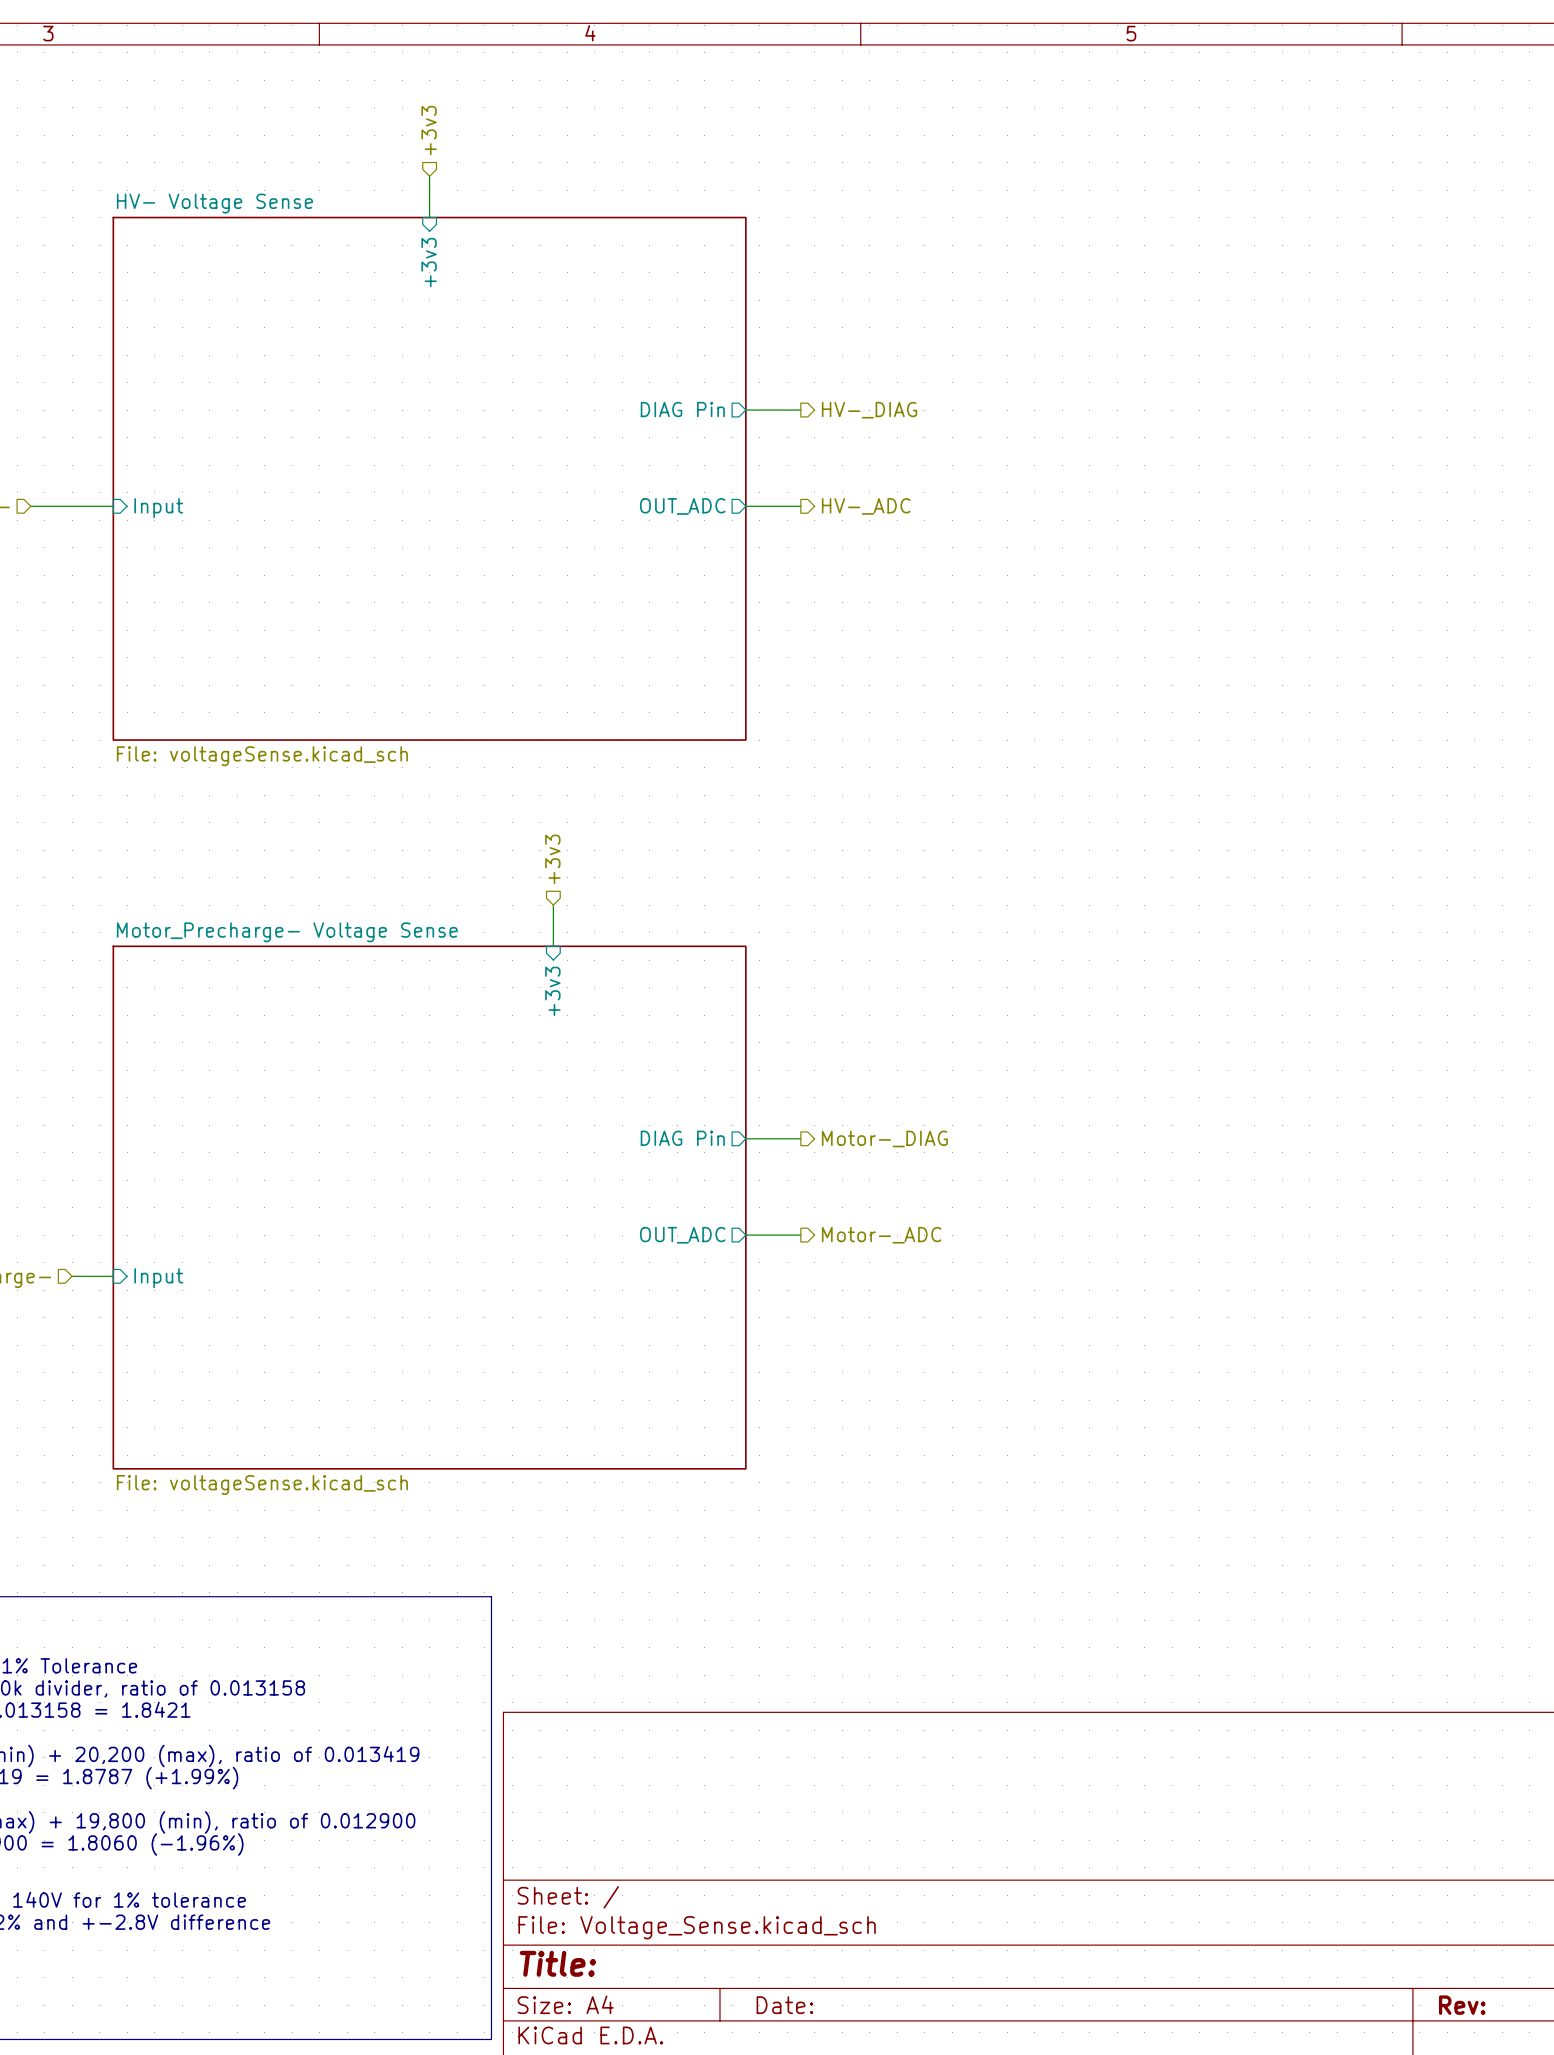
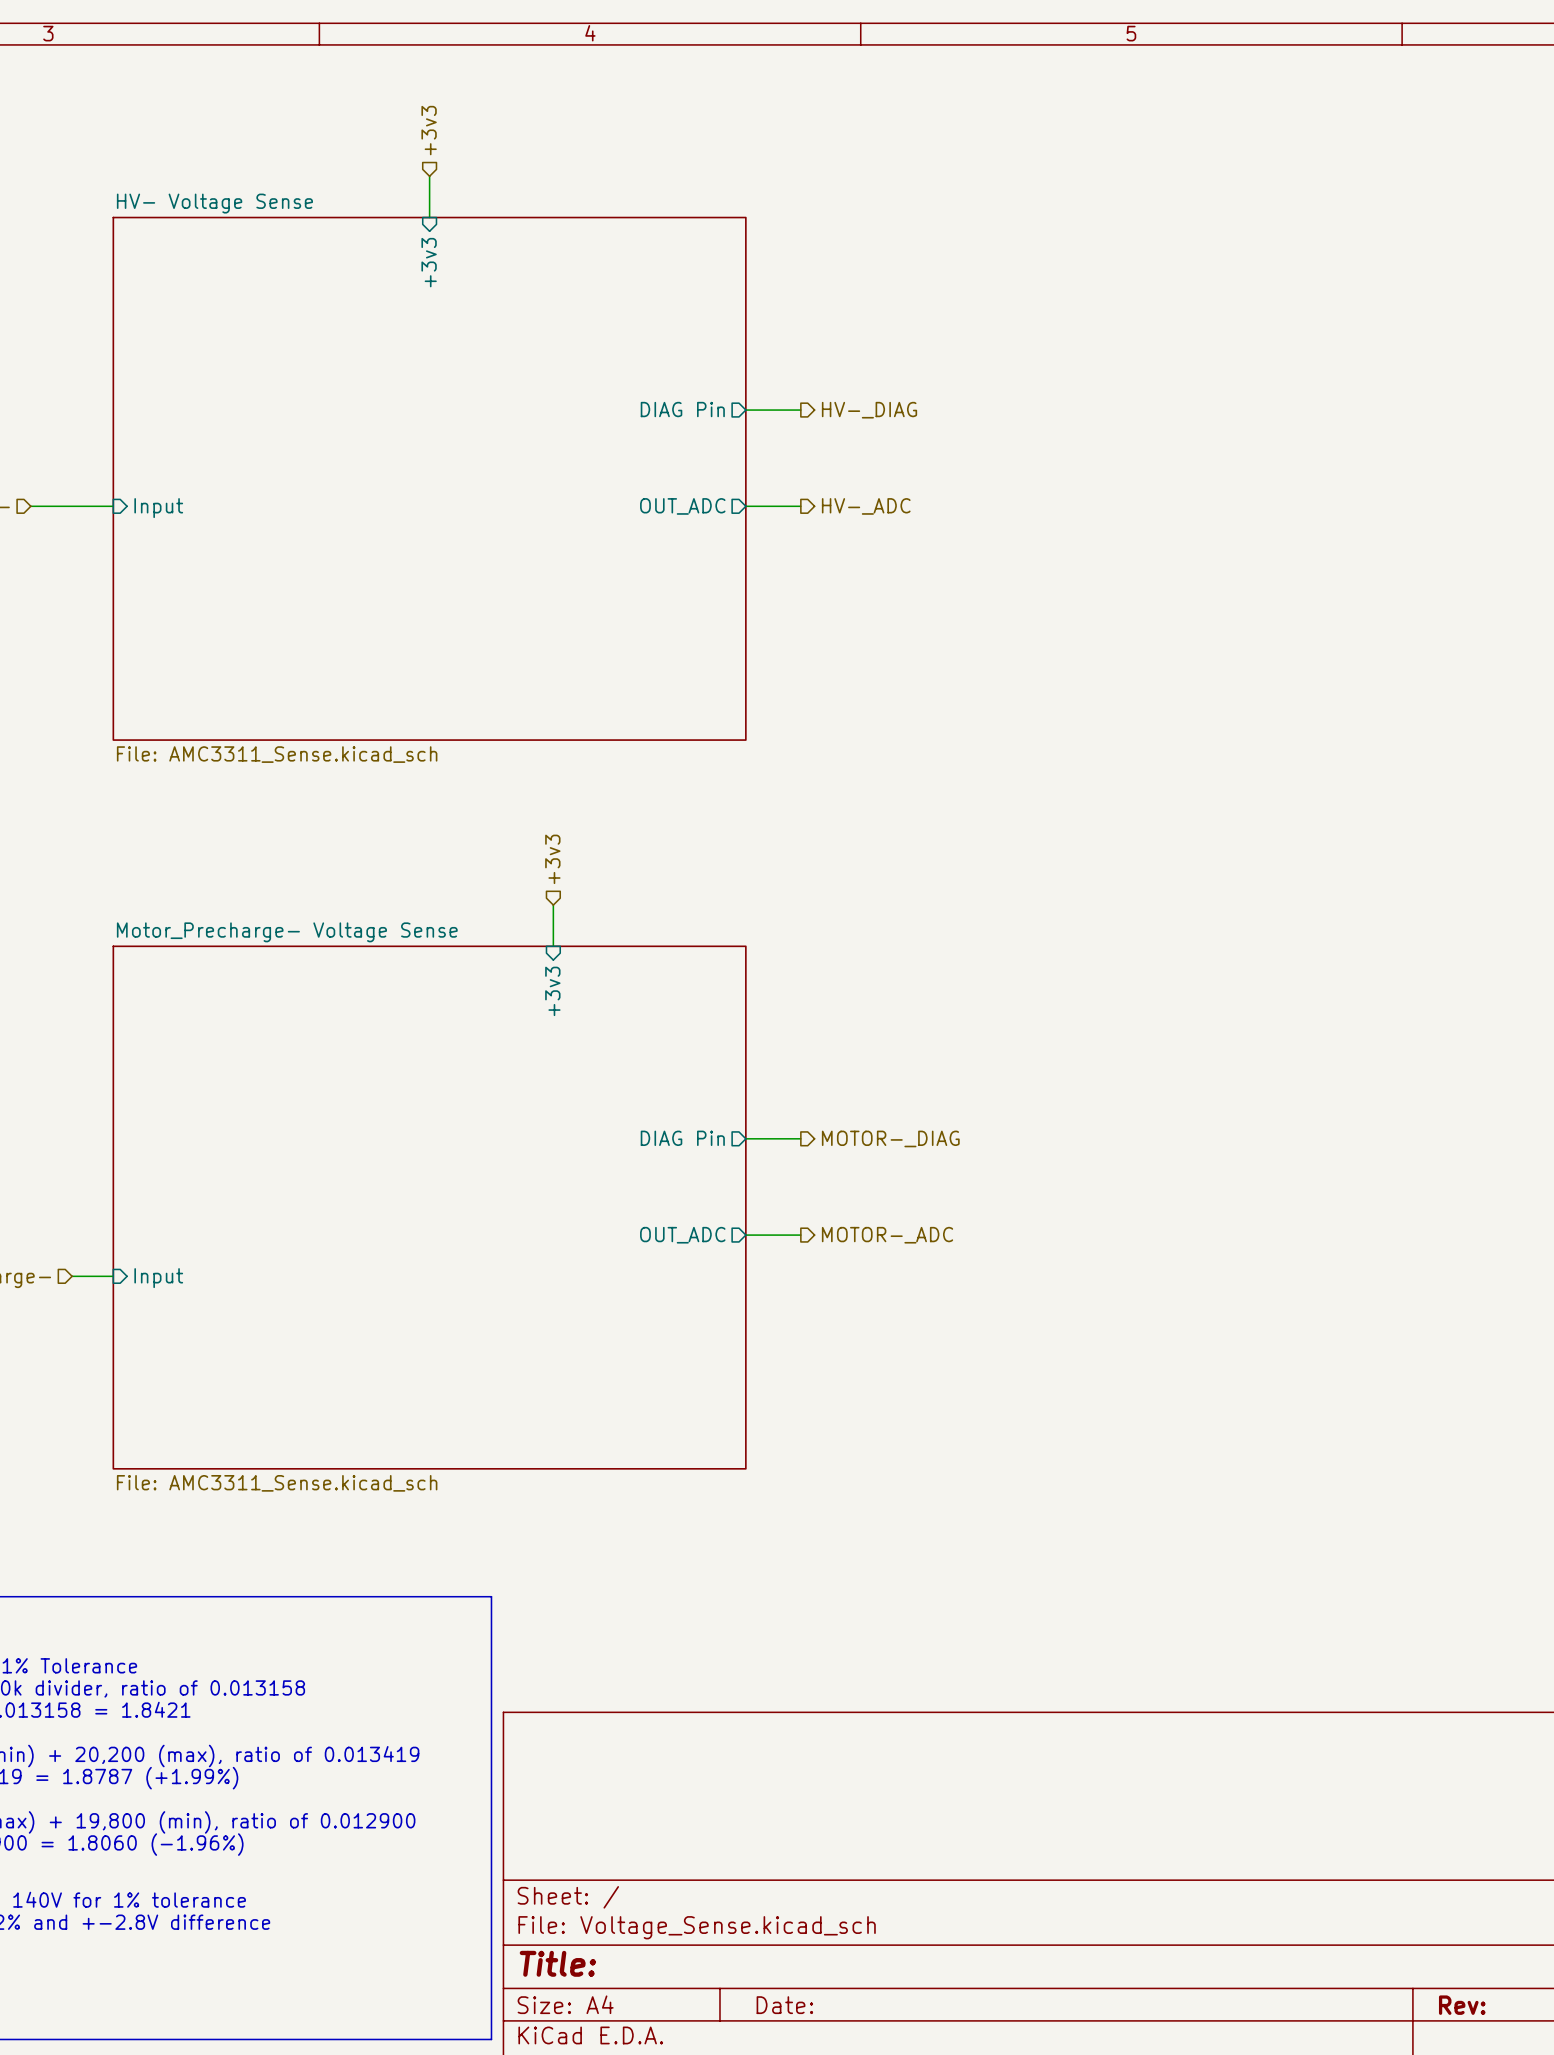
sheet HV- Voltage Sense value: File: voltageSense.kicad_sch (262, 756) -> File: AMC3311_Sense.kicad_sch (277, 754)
hierarchical label: Motor-_DIAG (884, 1138) -> MOTOR-_DIAG (890, 1138)
hierarchical label: Motor-_ADC (881, 1235) -> MOTOR-_ADC (887, 1235)
sheet Motor_Precharge- Voltage Sense value: File: voltageSense.kicad_sch (262, 1484) -> File: AMC3311_Sense.kicad_sch (277, 1483)

